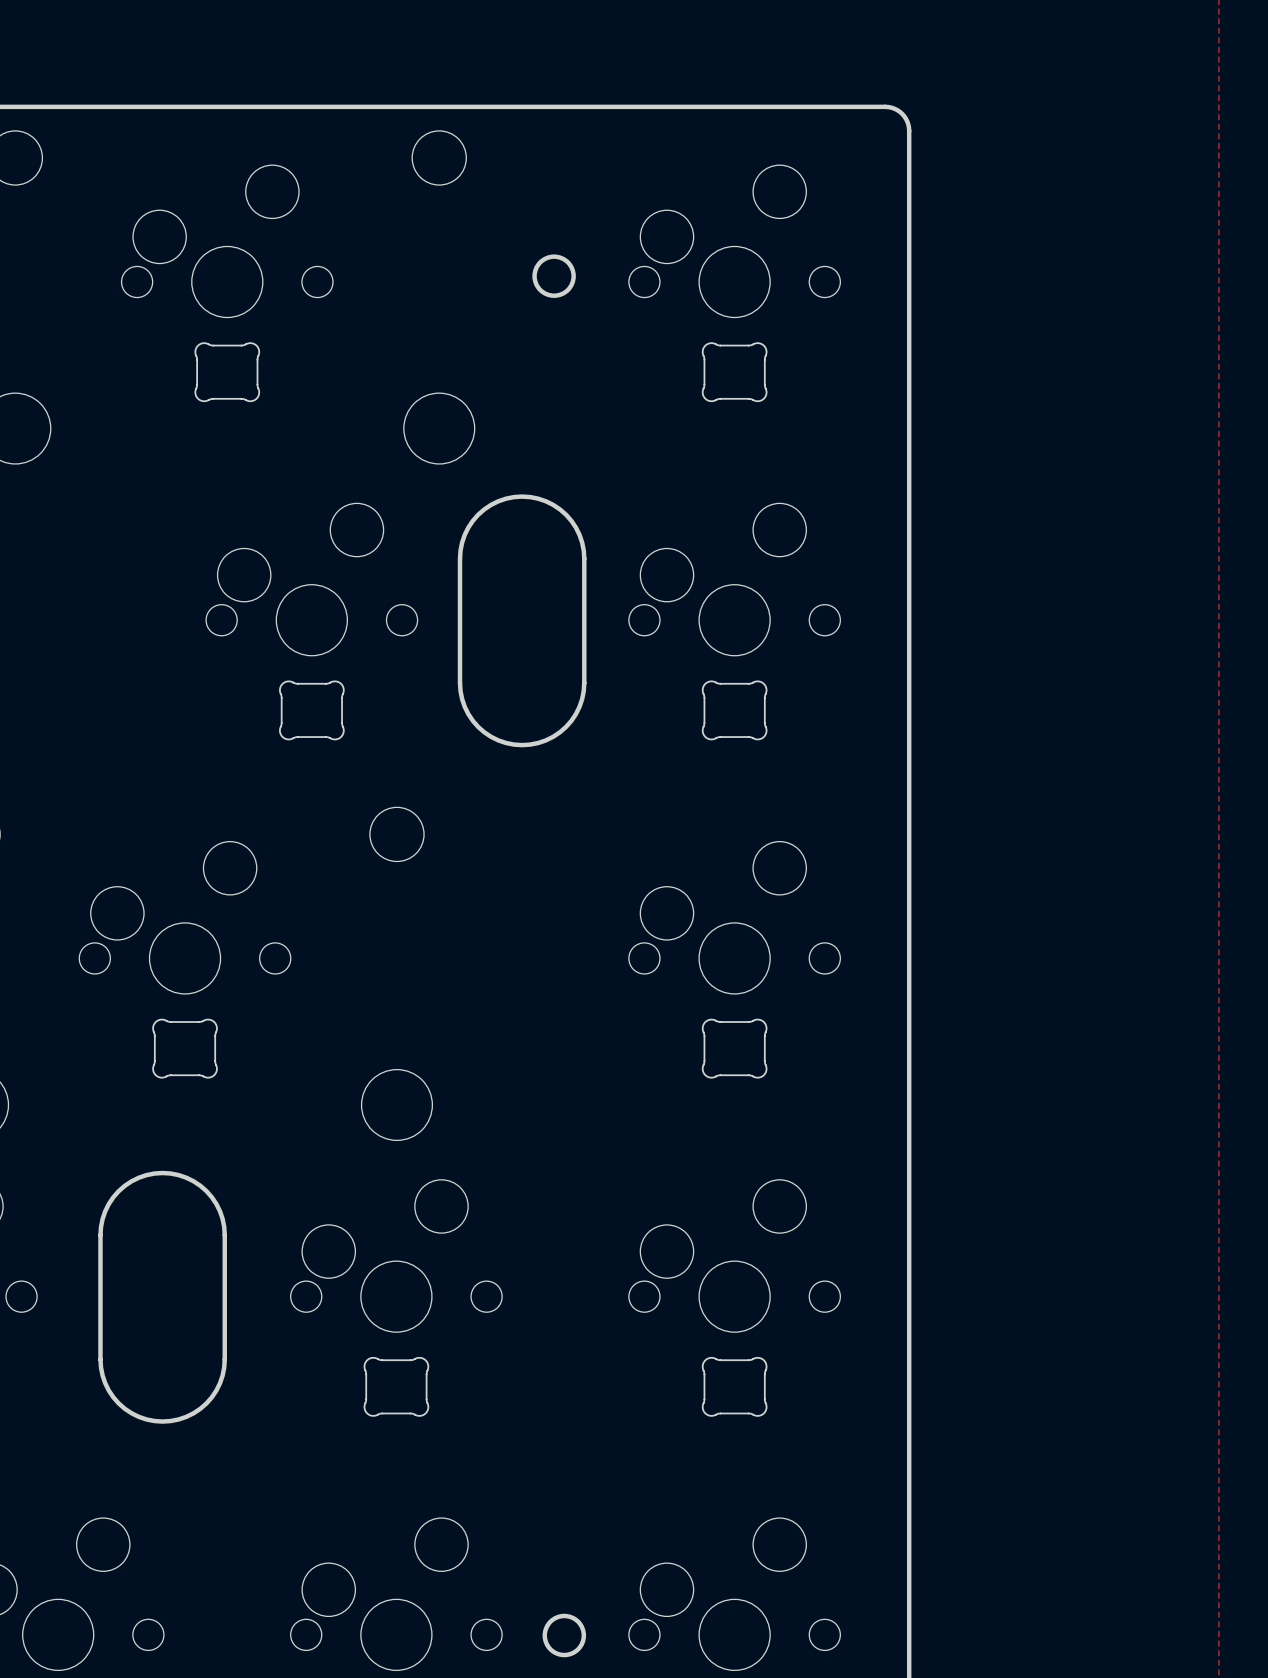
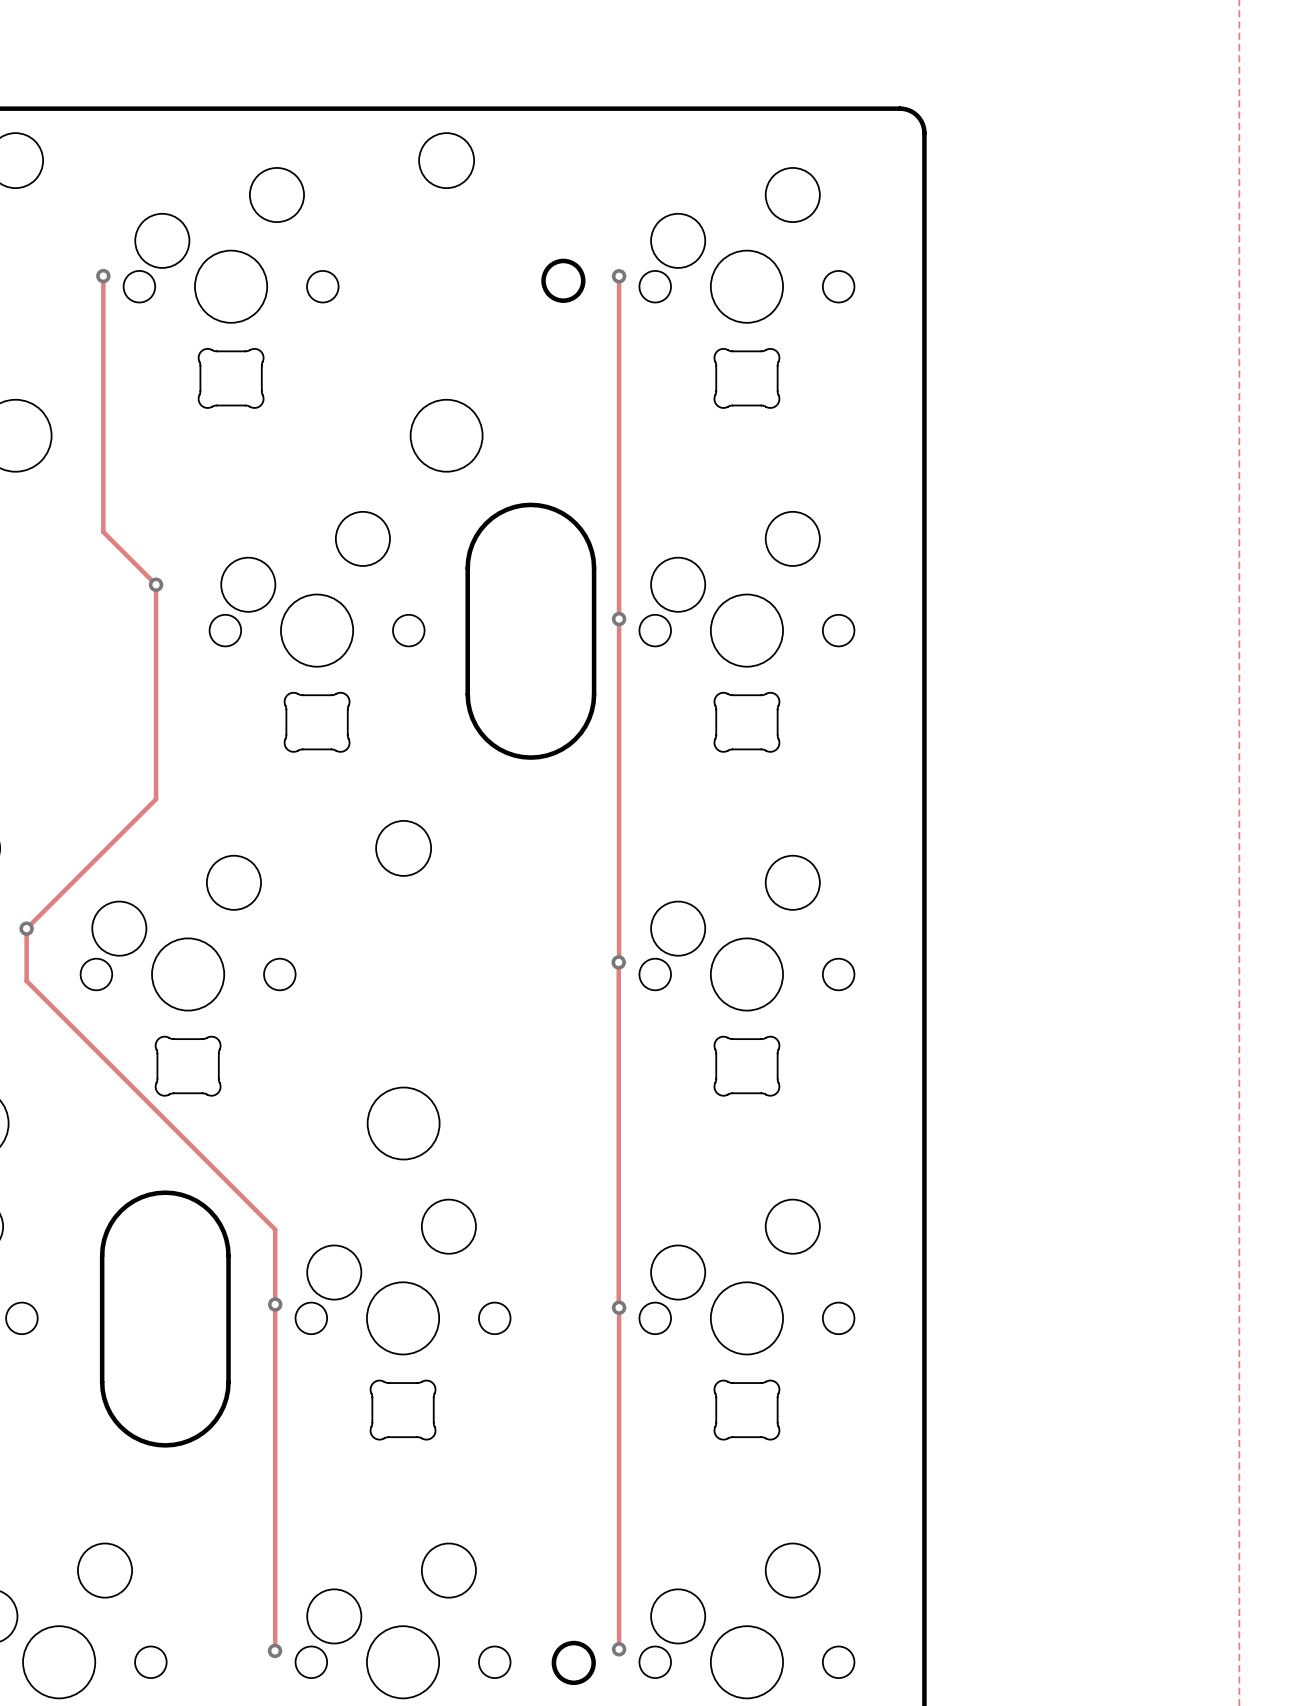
track: none -> (103, 276) (103, 532) (156, 584) (156, 799) (26, 928) (26, 981) (275, 1229) (275, 1650)
via: none -> (103, 276)
track: none -> (619, 276) (619, 1649)
via: none -> (619, 276)
via: none -> (156, 584)
via: none -> (619, 619)
via: none -> (26, 928)
via: none -> (618, 962)
via: none -> (275, 1304)
via: none -> (619, 1307)
via: none -> (619, 1649)
via: none -> (275, 1650)

